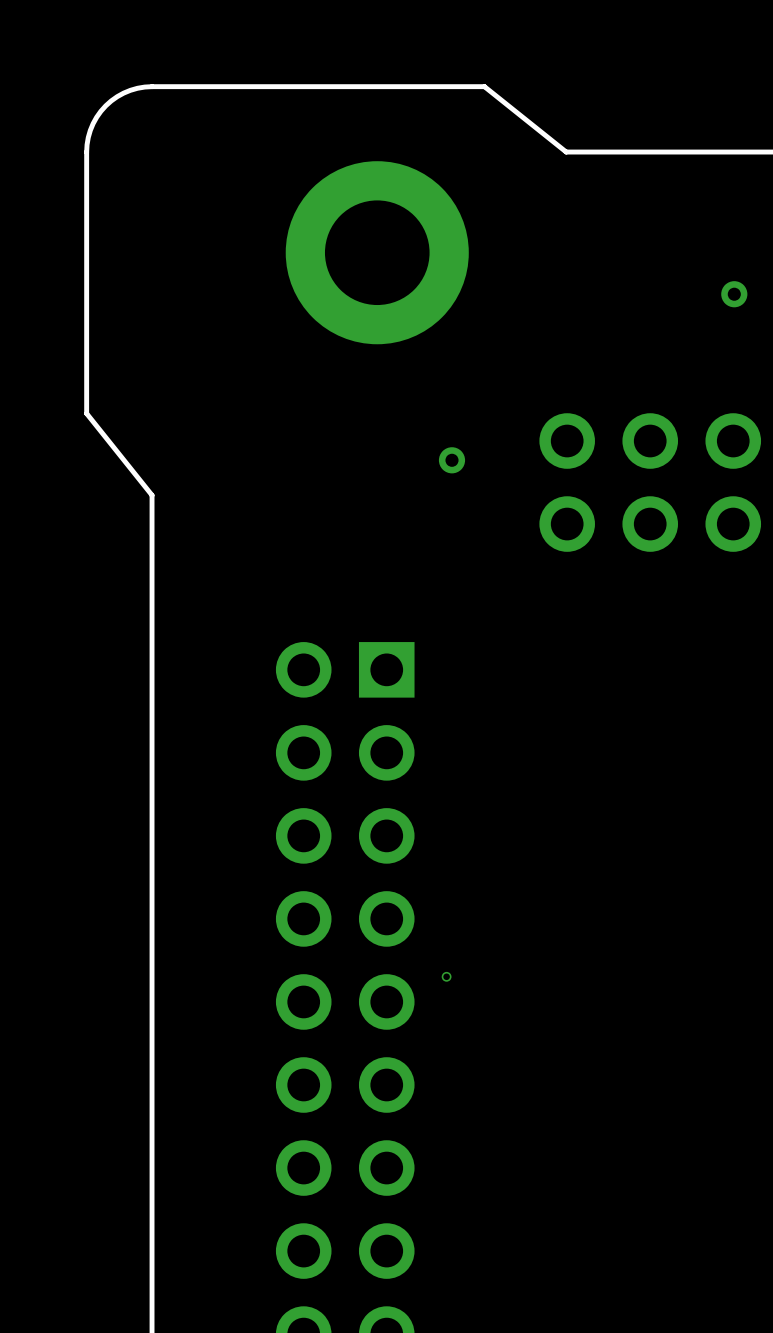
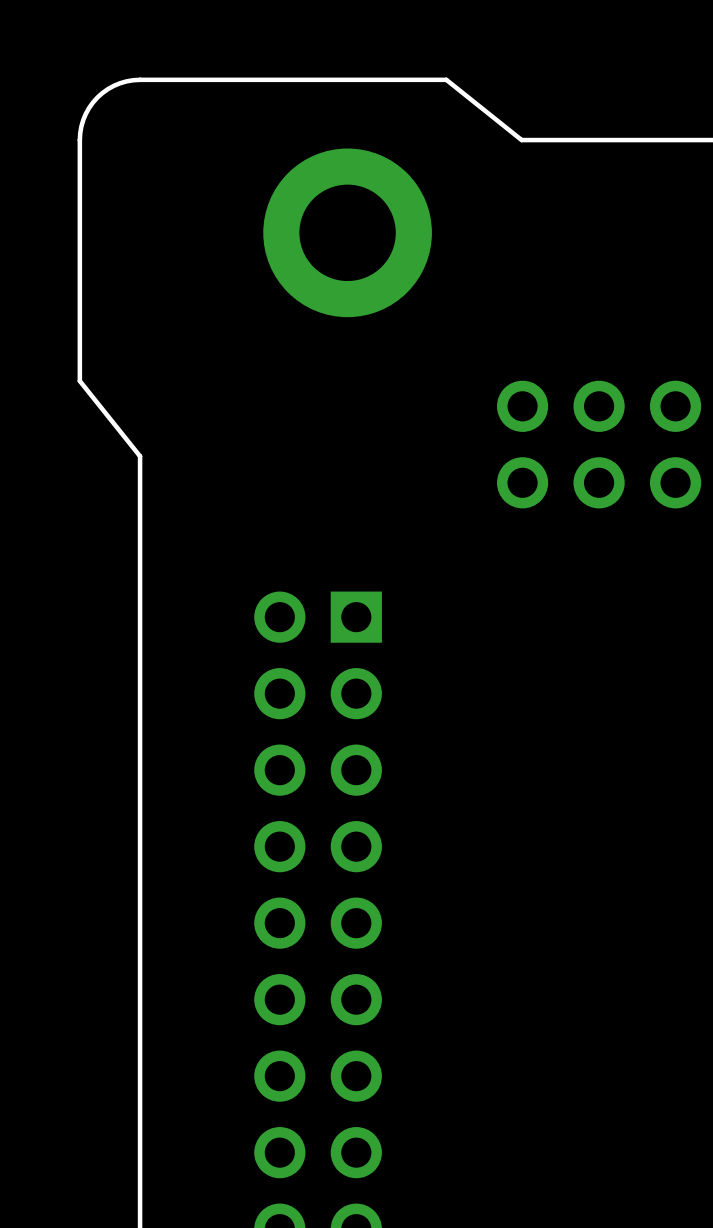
via: (734, 294) -> none
via: (451, 460) -> none
via: (446, 976) -> none

